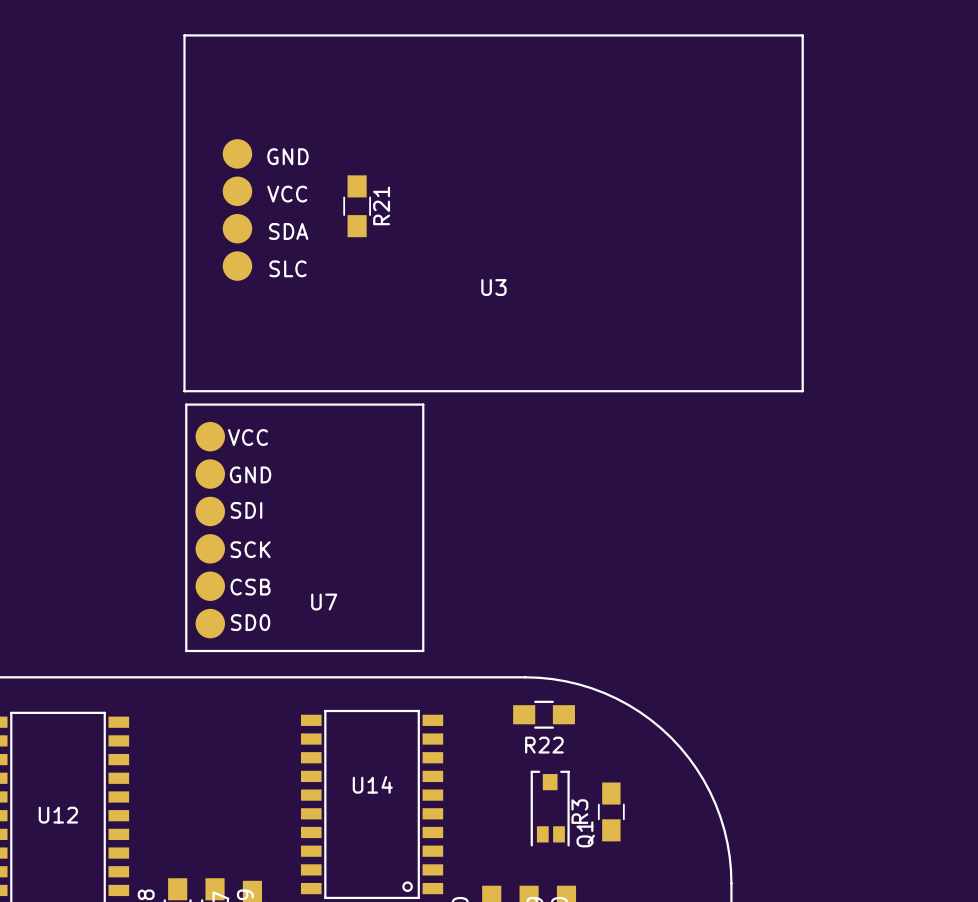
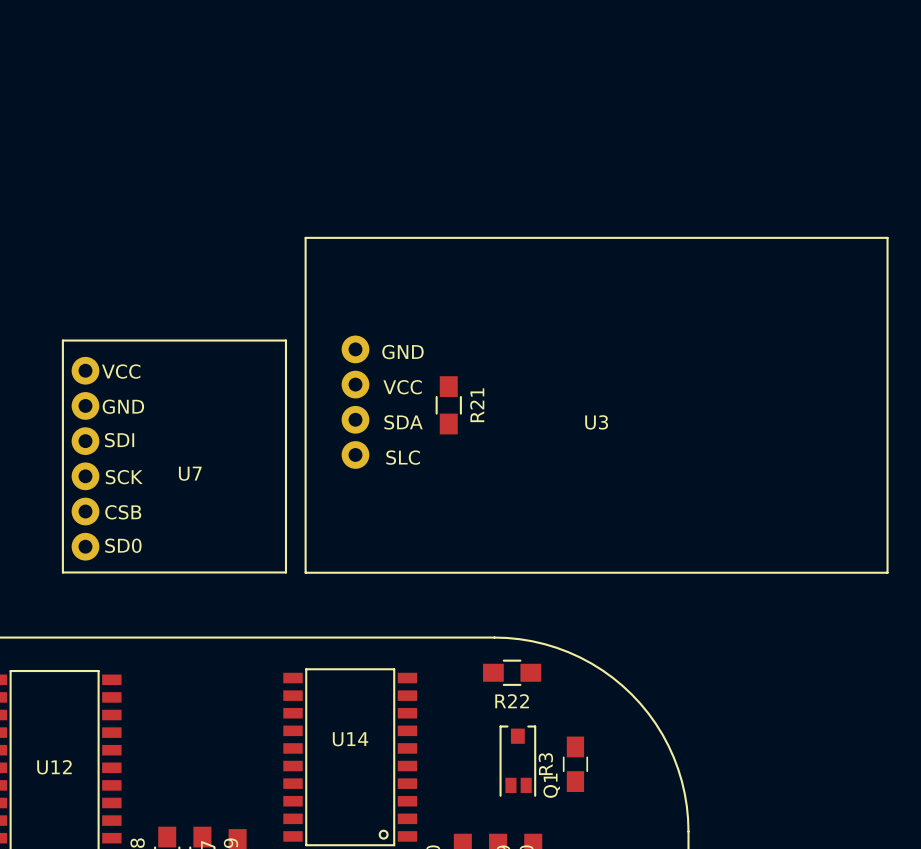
U3 footprint: [183, 34, 804, 393] -> [304, 236, 889, 574]
R21 footprint: [343, 175, 371, 238] -> [435, 376, 462, 435]
U3 name position: U3 (493, 287) -> U3 (596, 422)
U7 footprint: [185, 403, 425, 653] -> [61, 339, 288, 574]
U7 name position: U7 (324, 602) -> U7 (190, 473)

